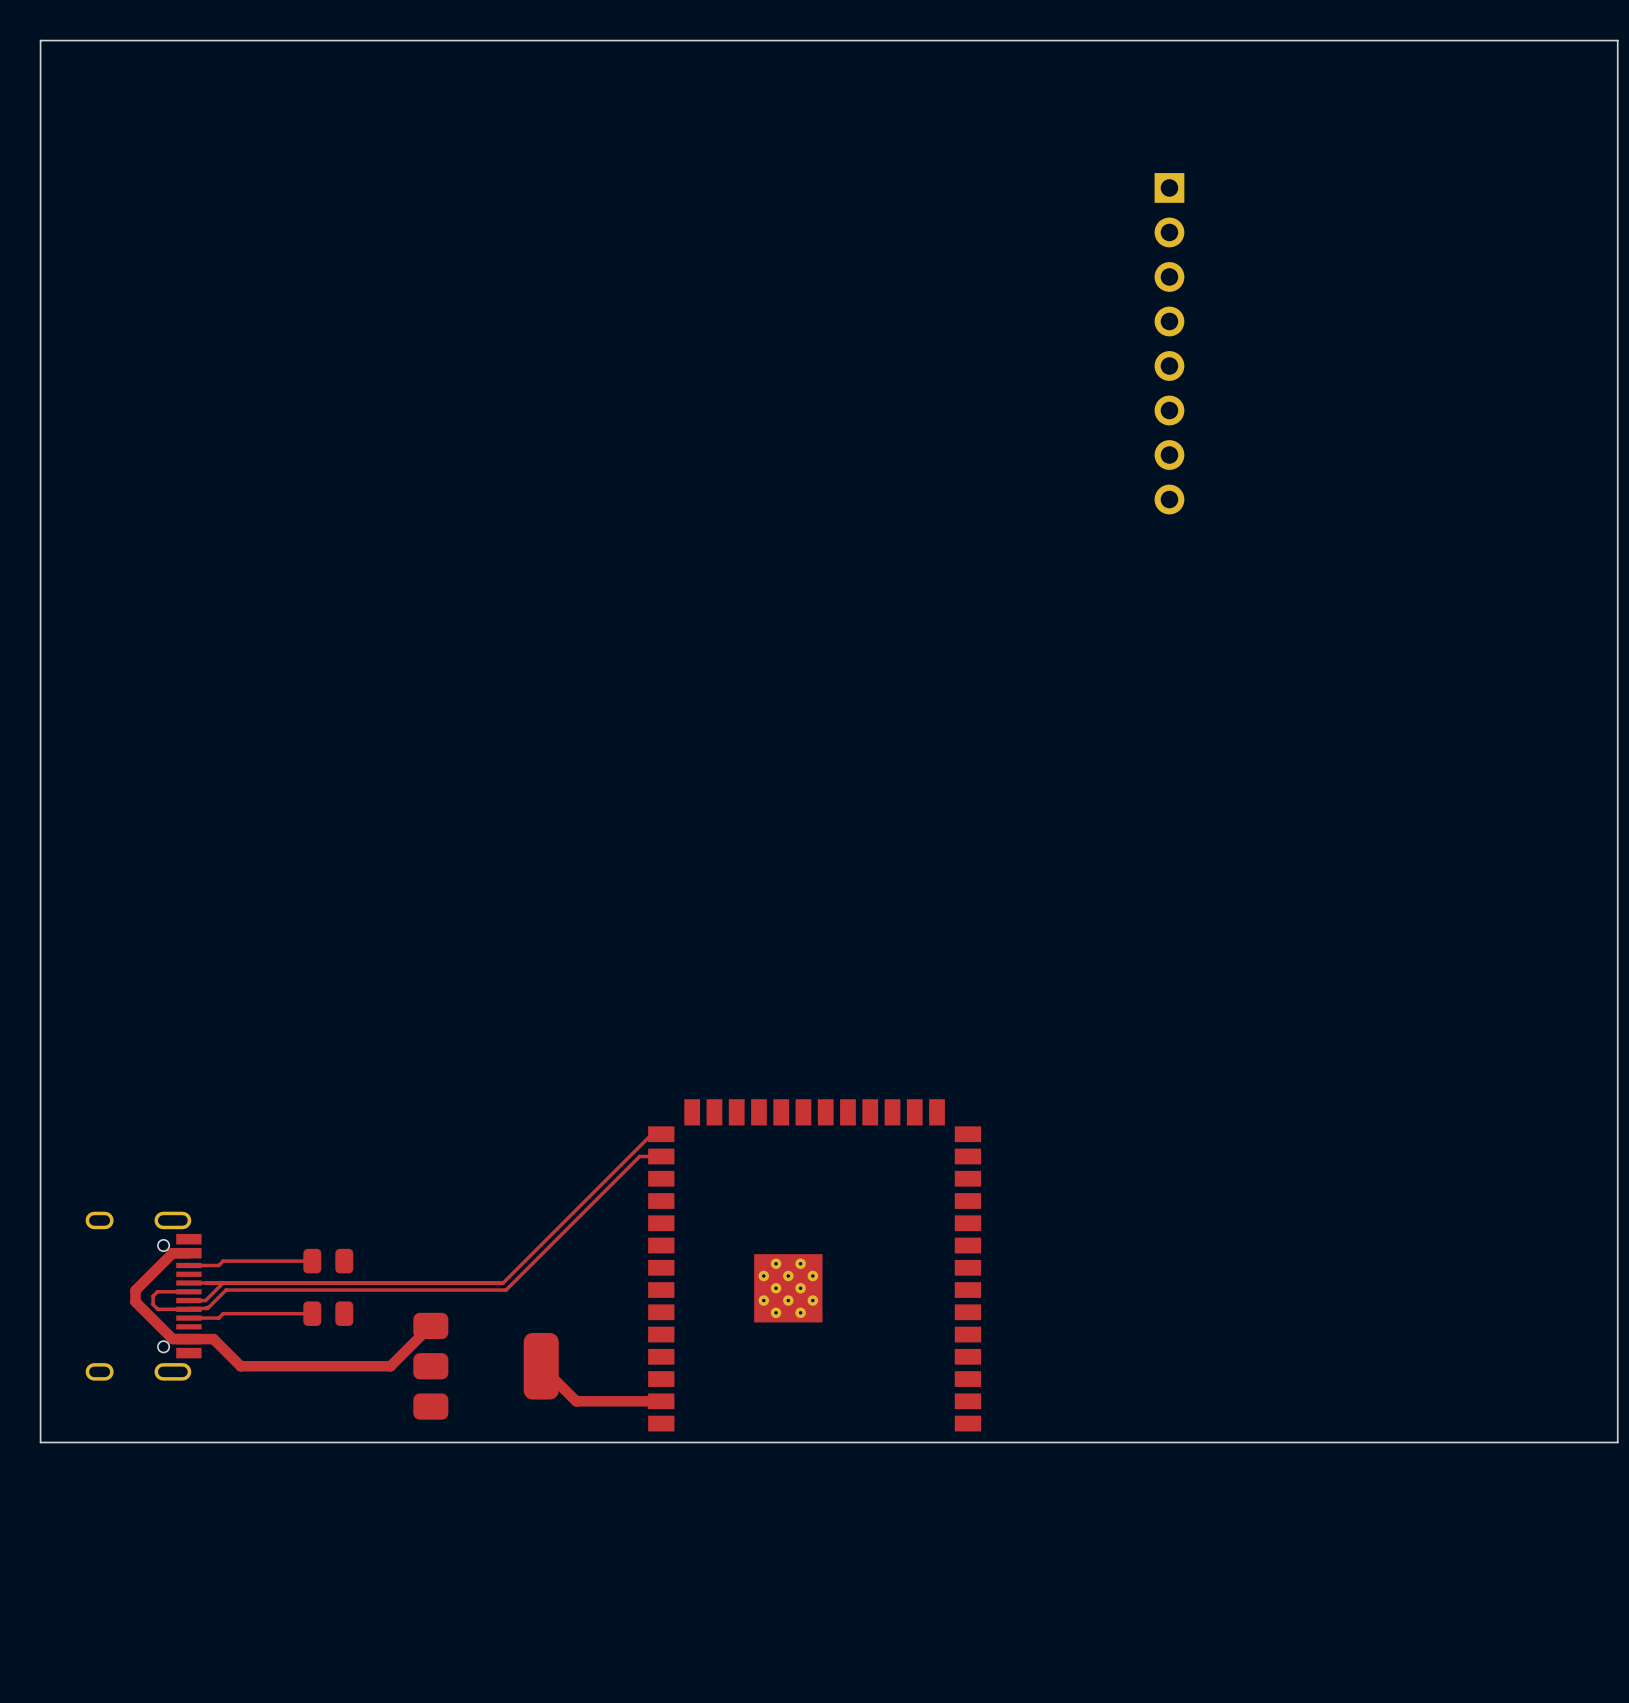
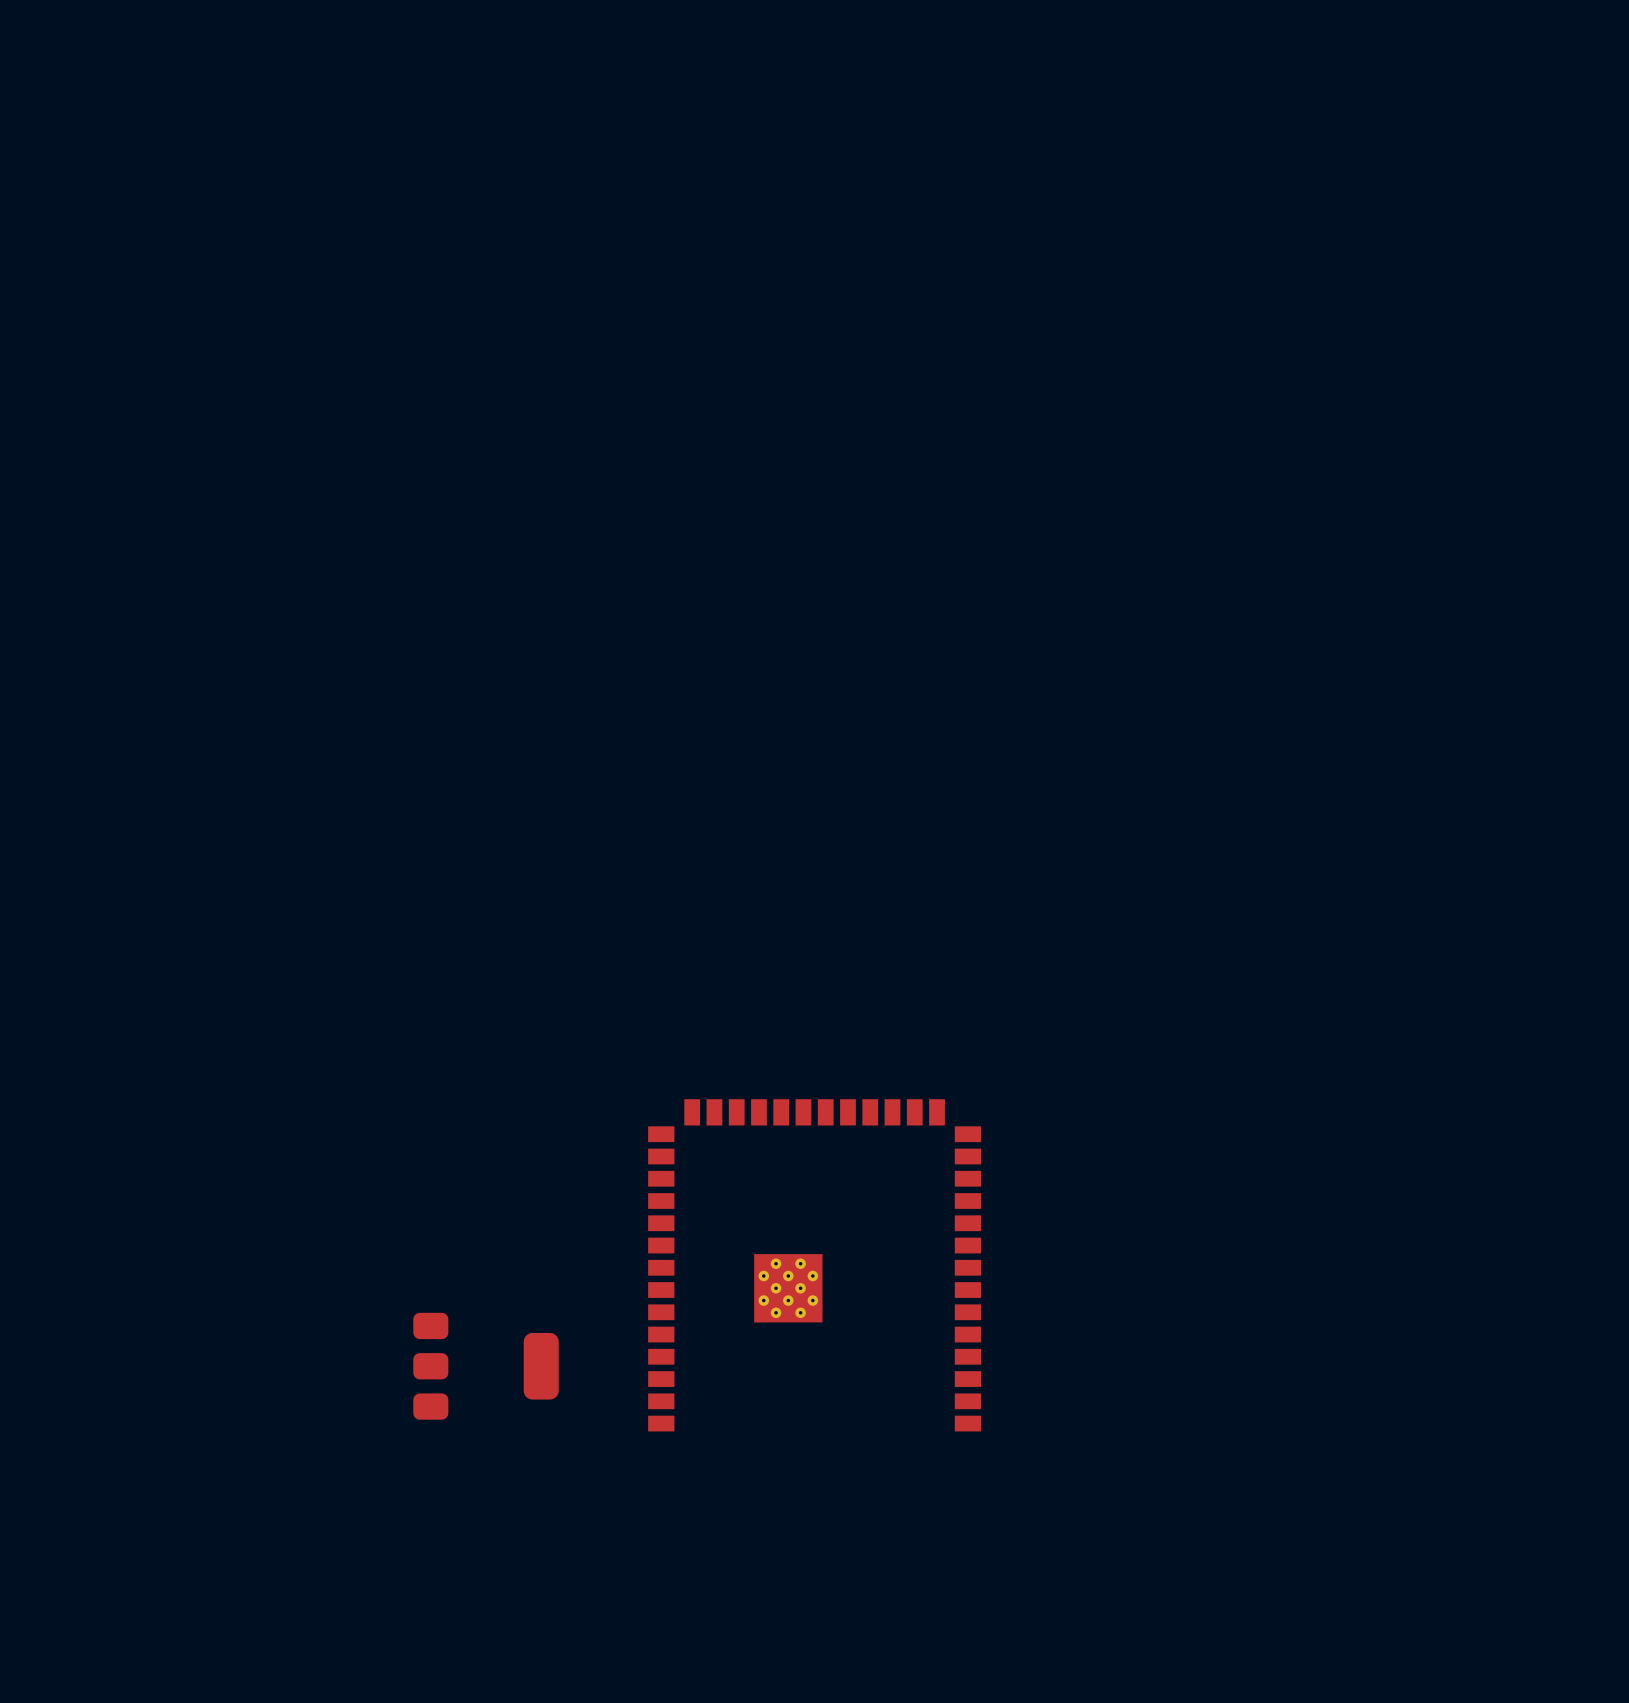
board edge: (1617, 40) (40, 40) (40, 1442) (1617, 1442) (1617, 40) -> none
part: (1169, 343) -> none
top track: (661, 1134) (651, 1134) (503, 1283) (188, 1283) -> none
top track: (661, 1156) (639, 1156) (506, 1290) (226, 1290) (206, 1308) (157, 1309) (153, 1304) (153, 1296) (157, 1291) (188, 1291) -> none
top track: (188, 1253) (172, 1253) (135, 1290) (135, 1301) (172, 1339) (213, 1339) (240, 1366) (390, 1366) (430, 1325) -> none
top track: (312, 1261) (223, 1261) (218, 1265) (188, 1265) -> none
part: (328, 1261) -> none
top track: (223, 1283) (205, 1300) (189, 1299) -> none
part: (143, 1296) -> none
top track: (312, 1313) (223, 1313) (218, 1318) (188, 1318) -> none
part: (328, 1313) -> none
top track: (541, 1366) (576, 1401) (661, 1401) -> none

